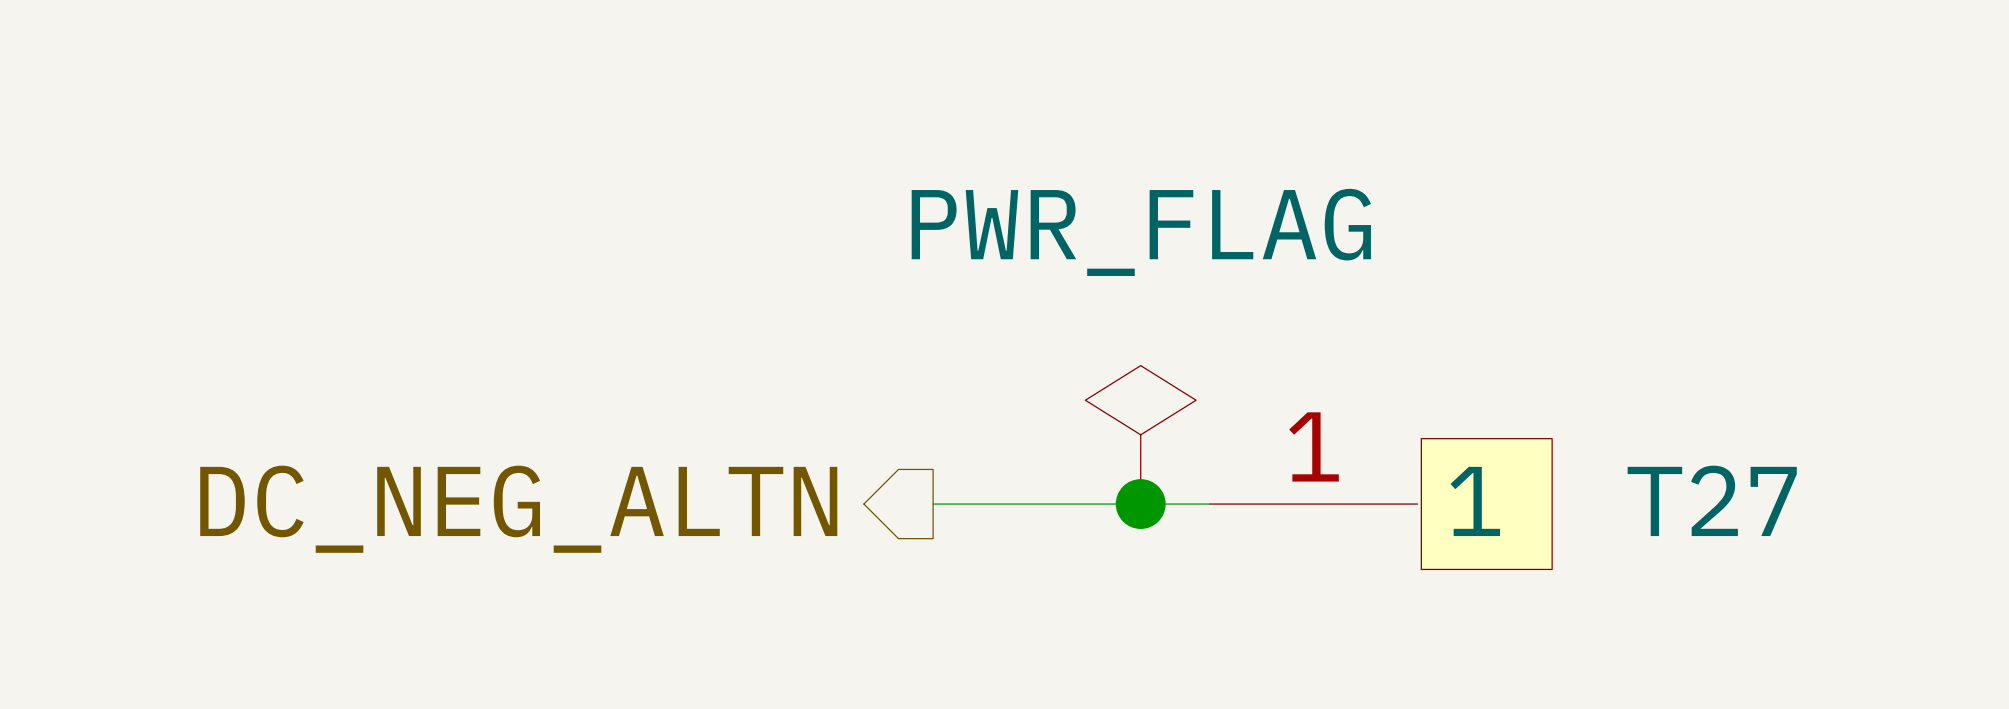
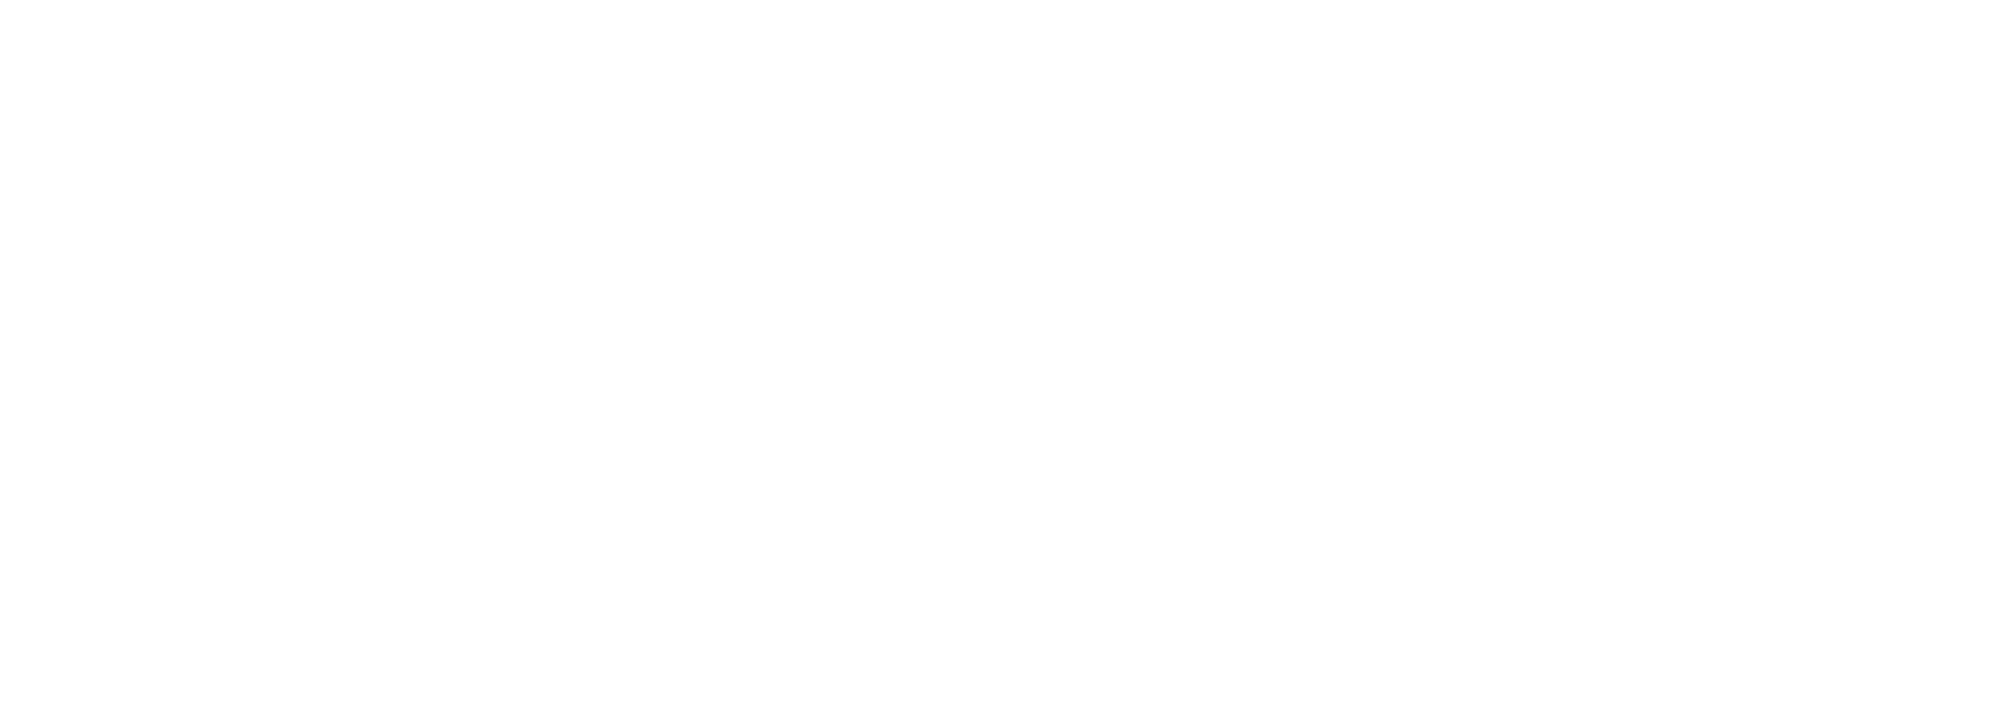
power symbol: PWR_FLAG (1140, 434) -> none
wire: (933, 504) (1209, 504) -> none
junction: (1140, 504) -> none
T27: (1381, 504) -> none
hierarchical label: DC_NEG_ALTN (518, 509) -> none

